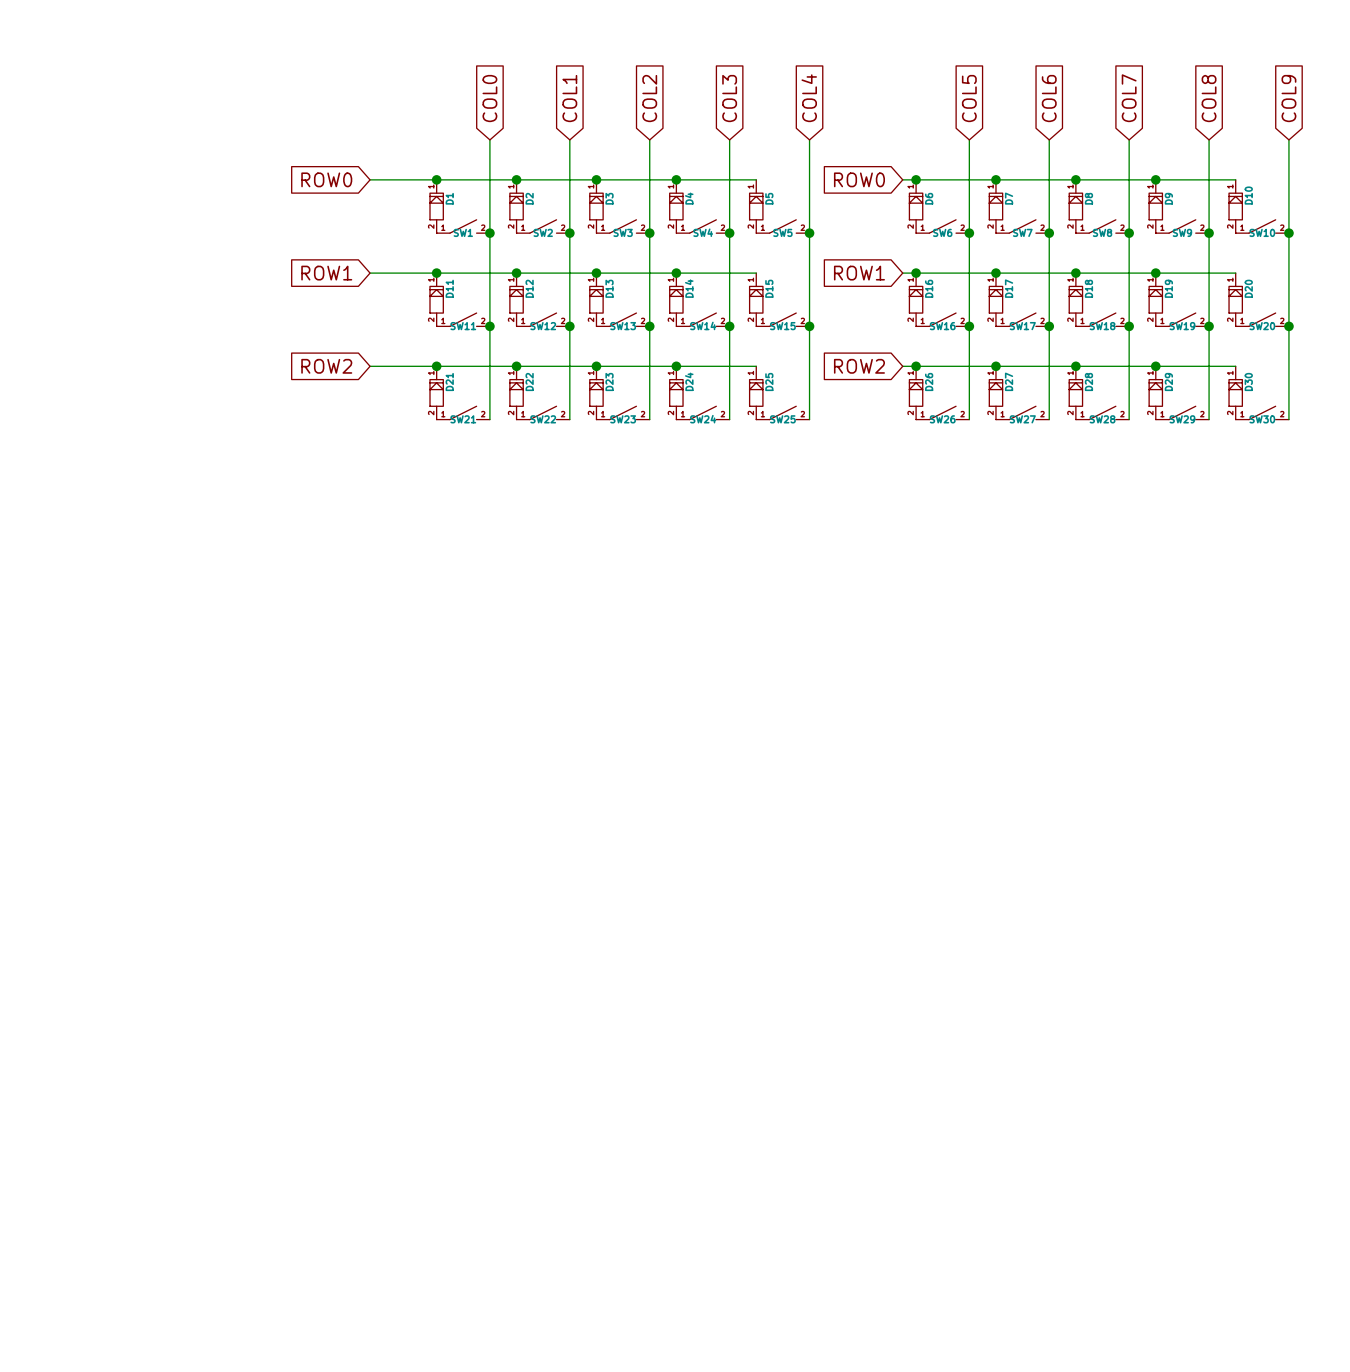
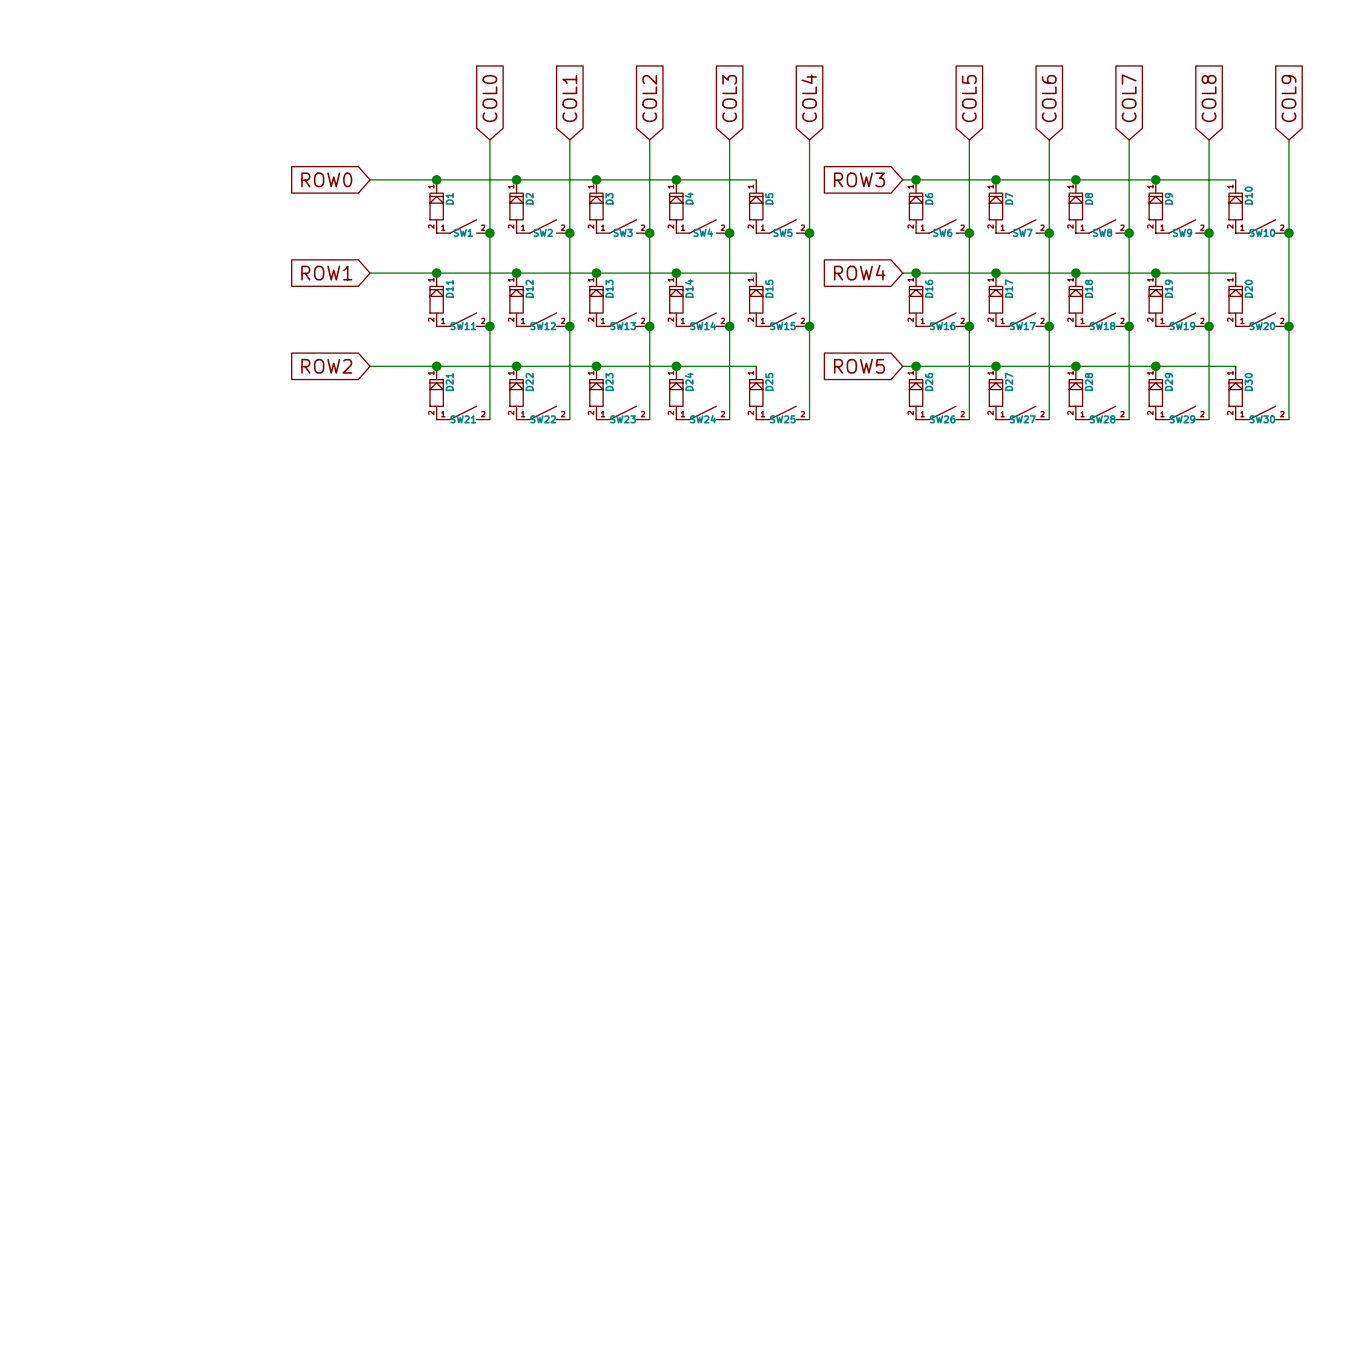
global label: ROW0 (859, 179) -> ROW3 (859, 179)
global label: ROW1 (859, 273) -> ROW4 (859, 272)
global label: ROW2 (859, 366) -> ROW5 (859, 366)

